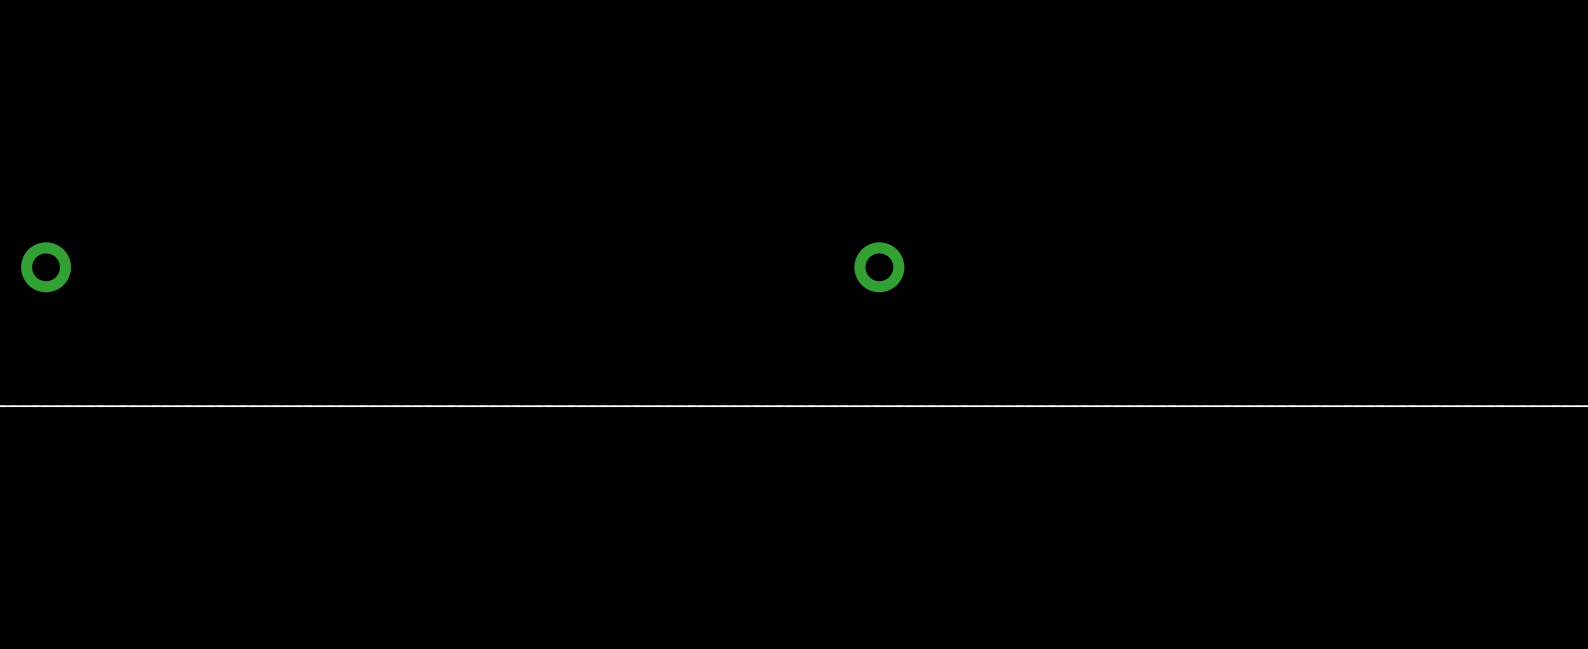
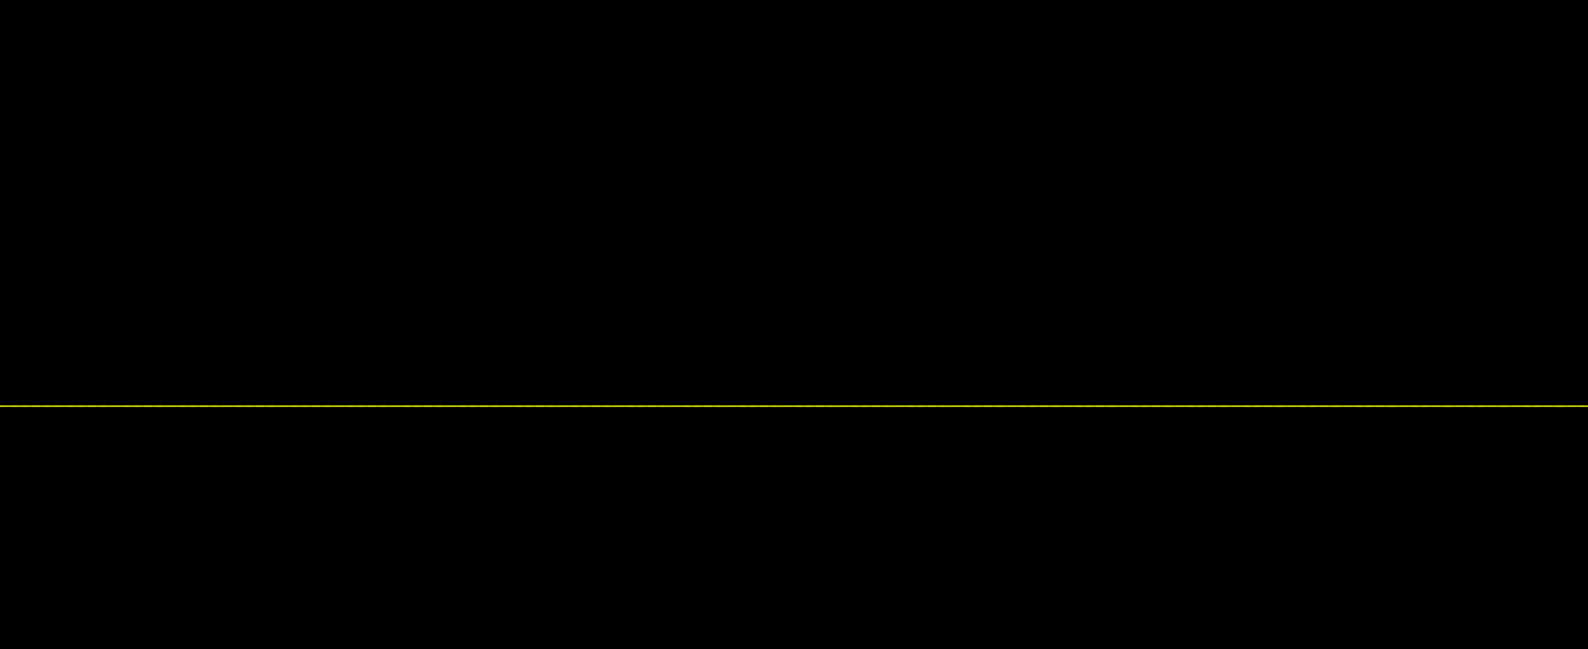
via: (46, 267) -> none
via: (879, 267) -> none

